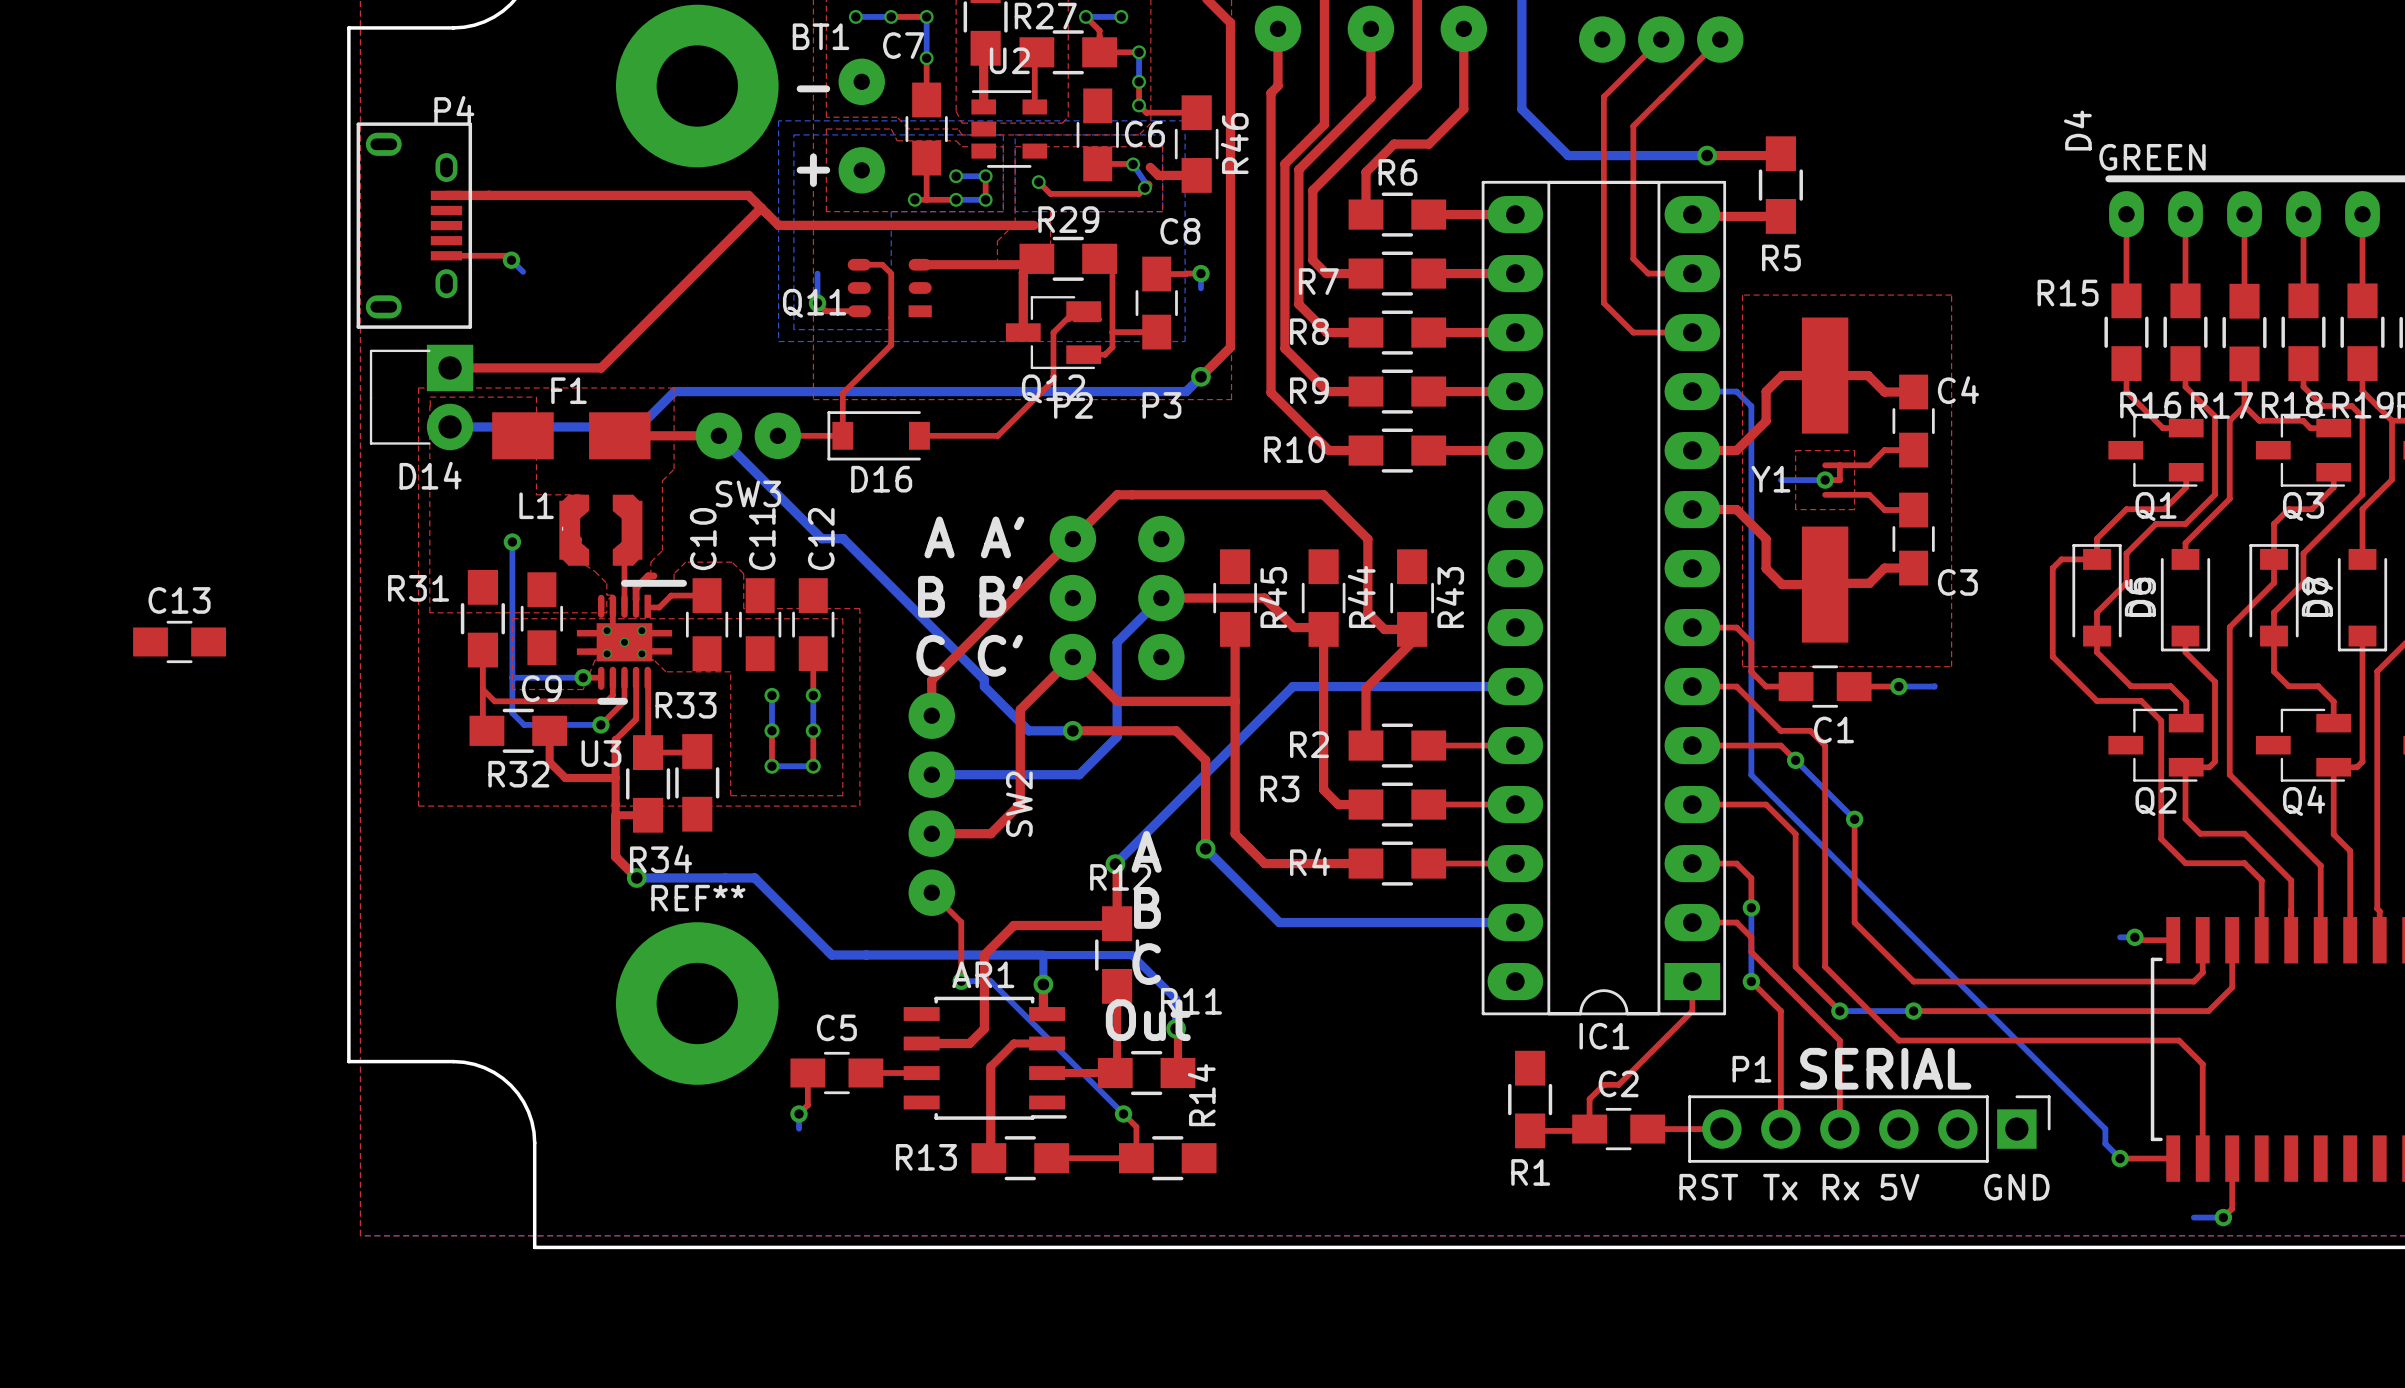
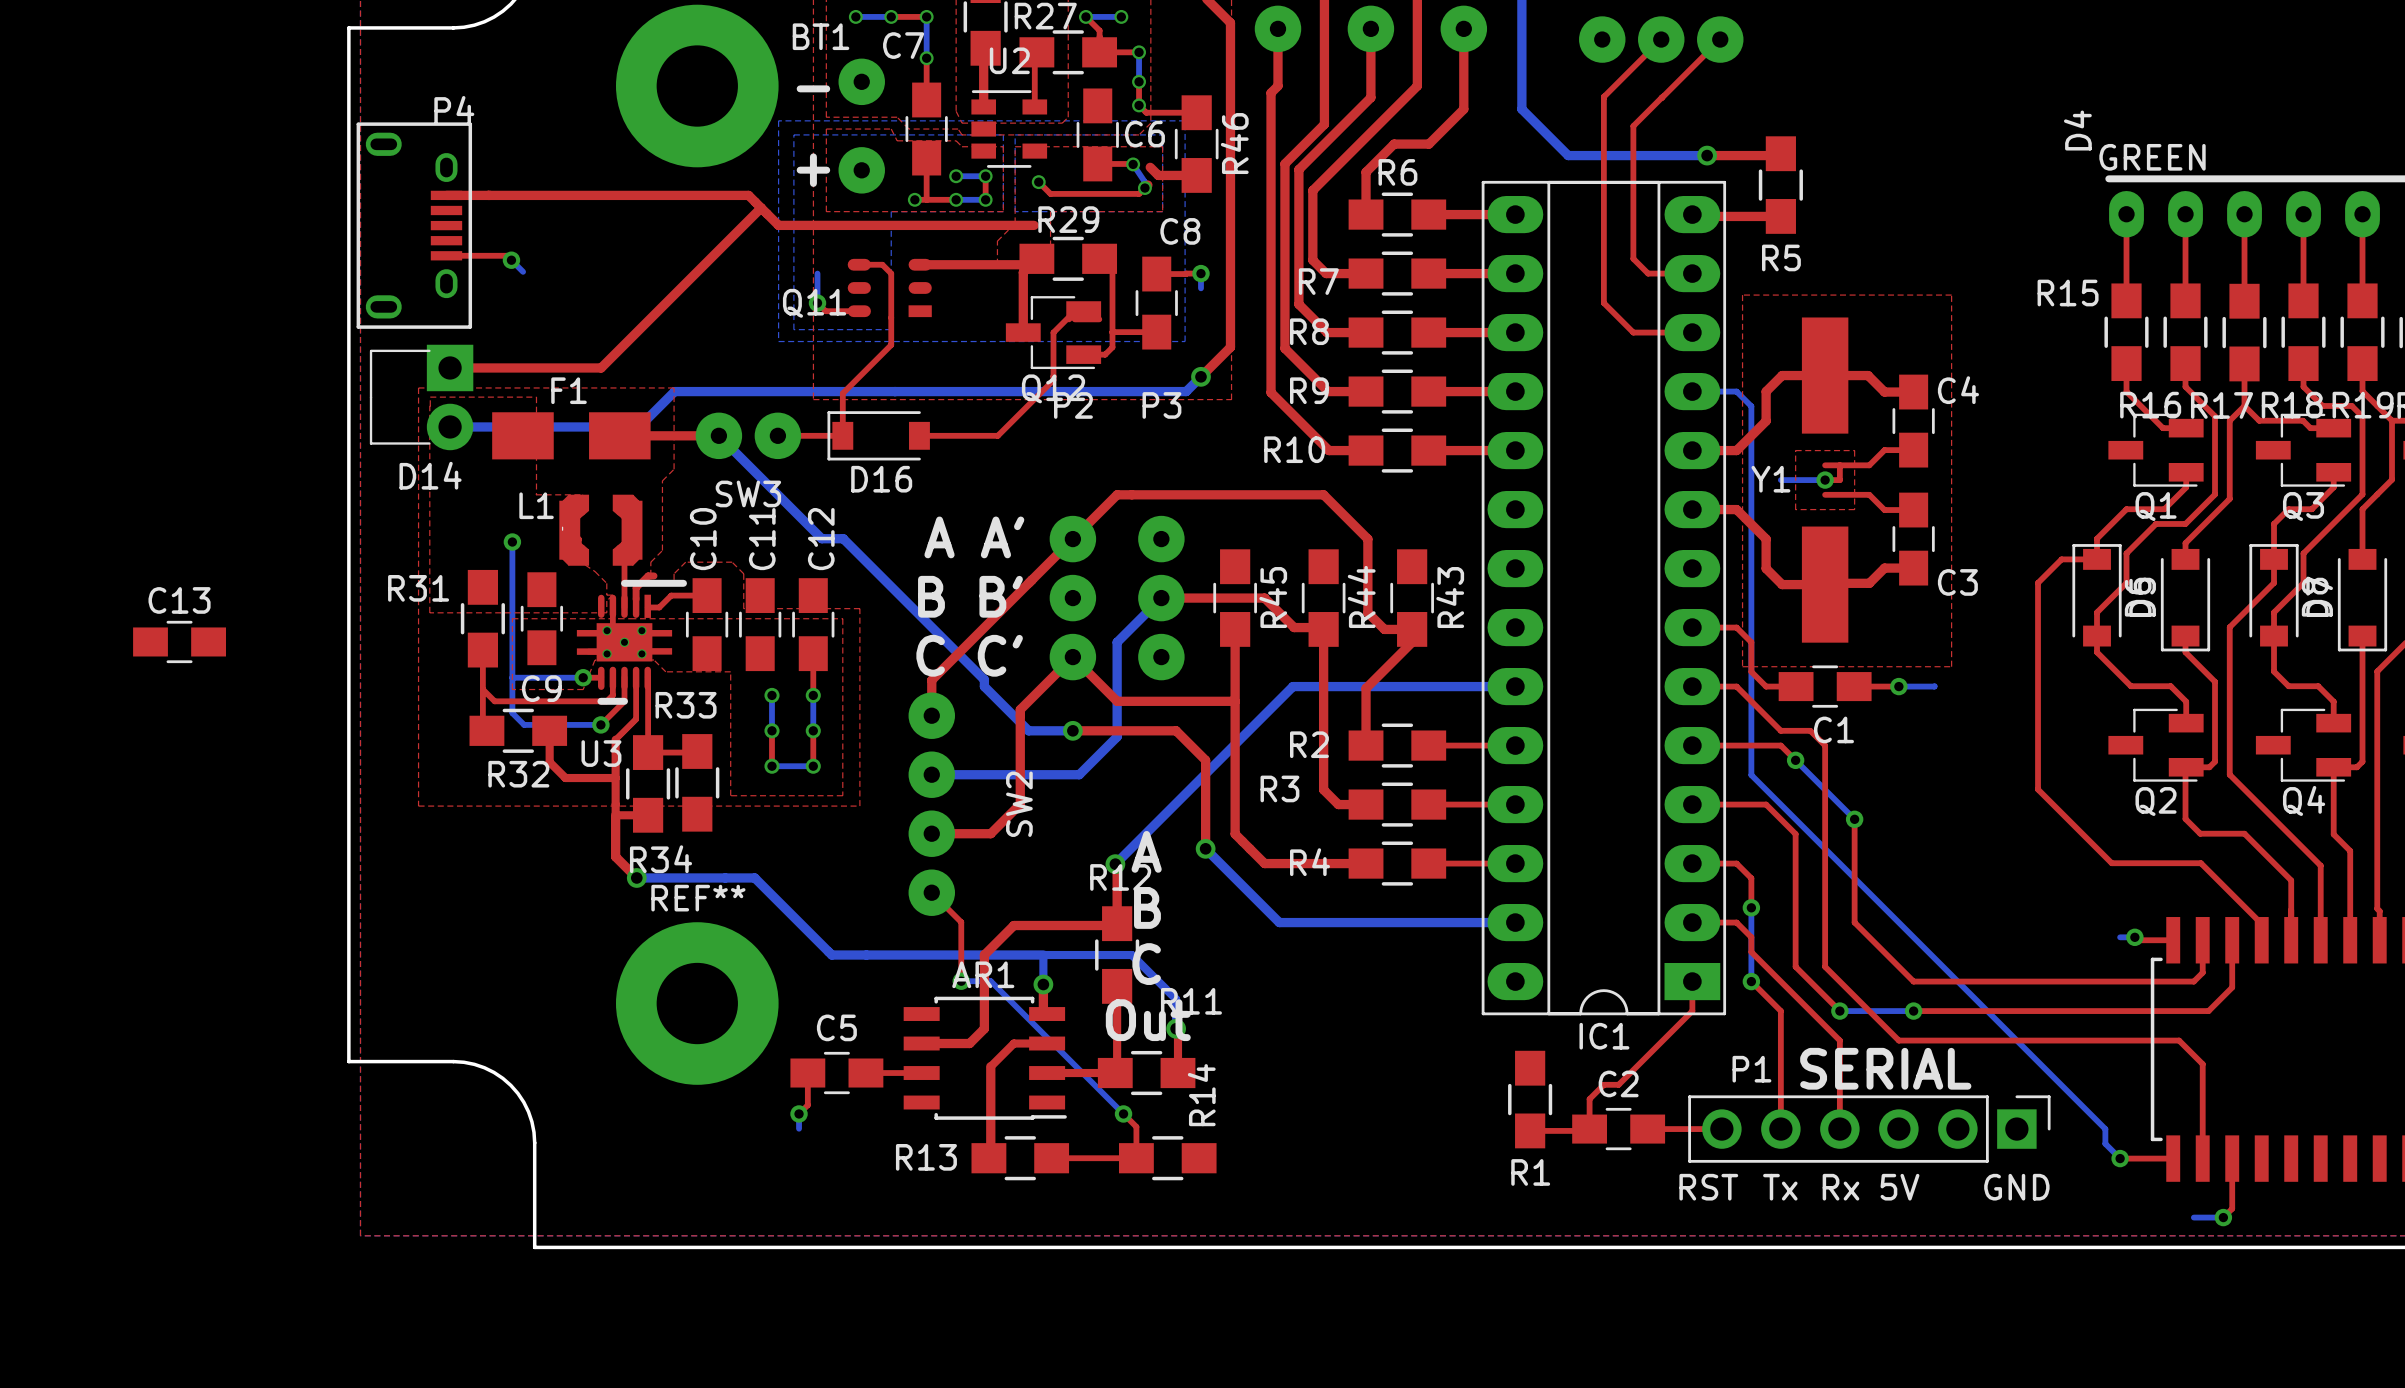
top track: (2052, 568) (2052, 656) (2097, 700) (2141, 700) (2161, 720) (2161, 838) (2185, 863) -> (2052, 568) (2038, 582) (2038, 789) (2111, 863) (2185, 863)
top track: (2200, 863) (2244, 863) (2261, 880) (2261, 923) -> (2200, 863) (2261, 923)

